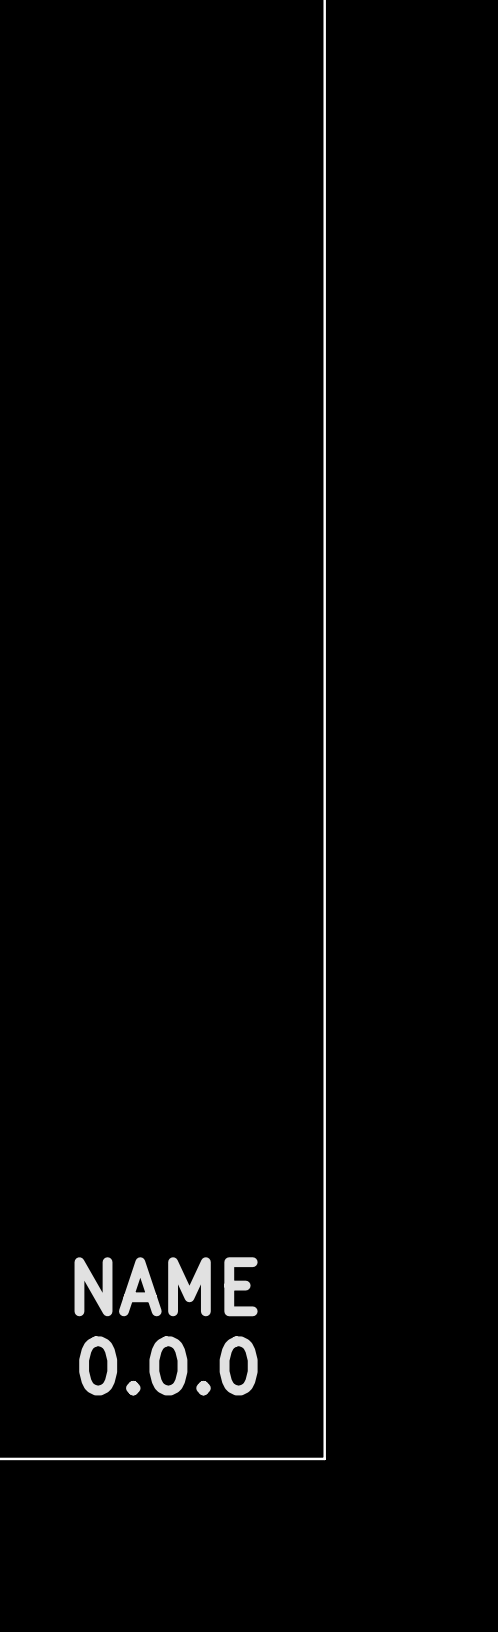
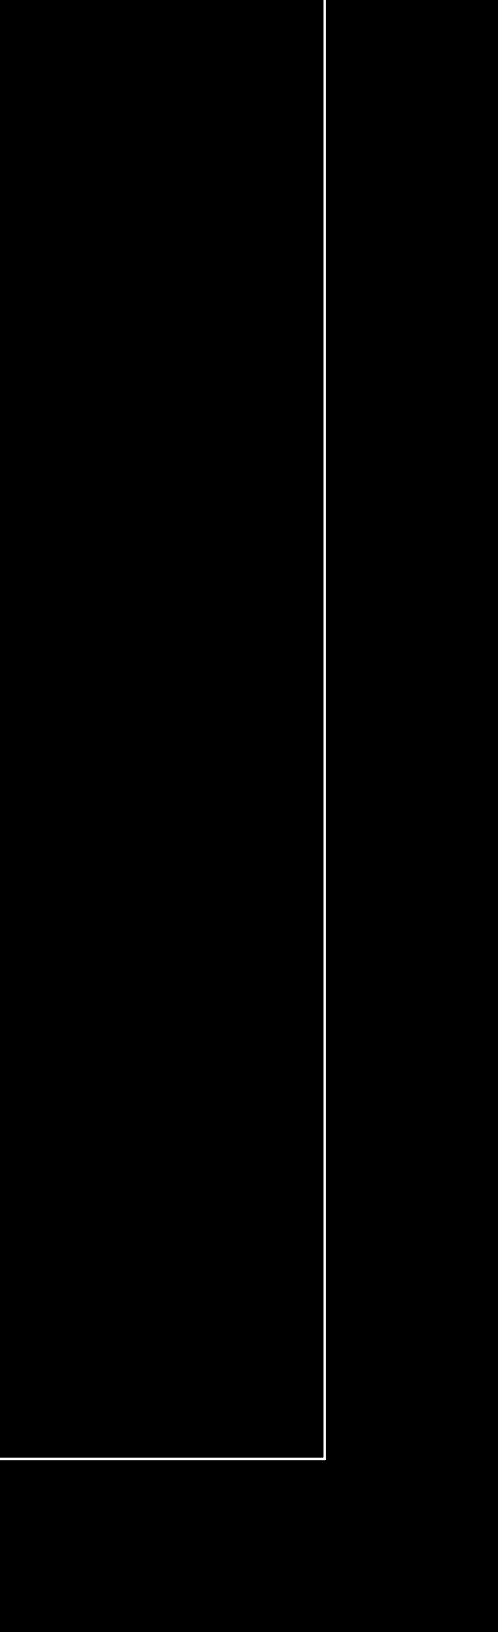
text: NAME (166, 1286) -> none
text: 0.0.0 (168, 1365) -> none

